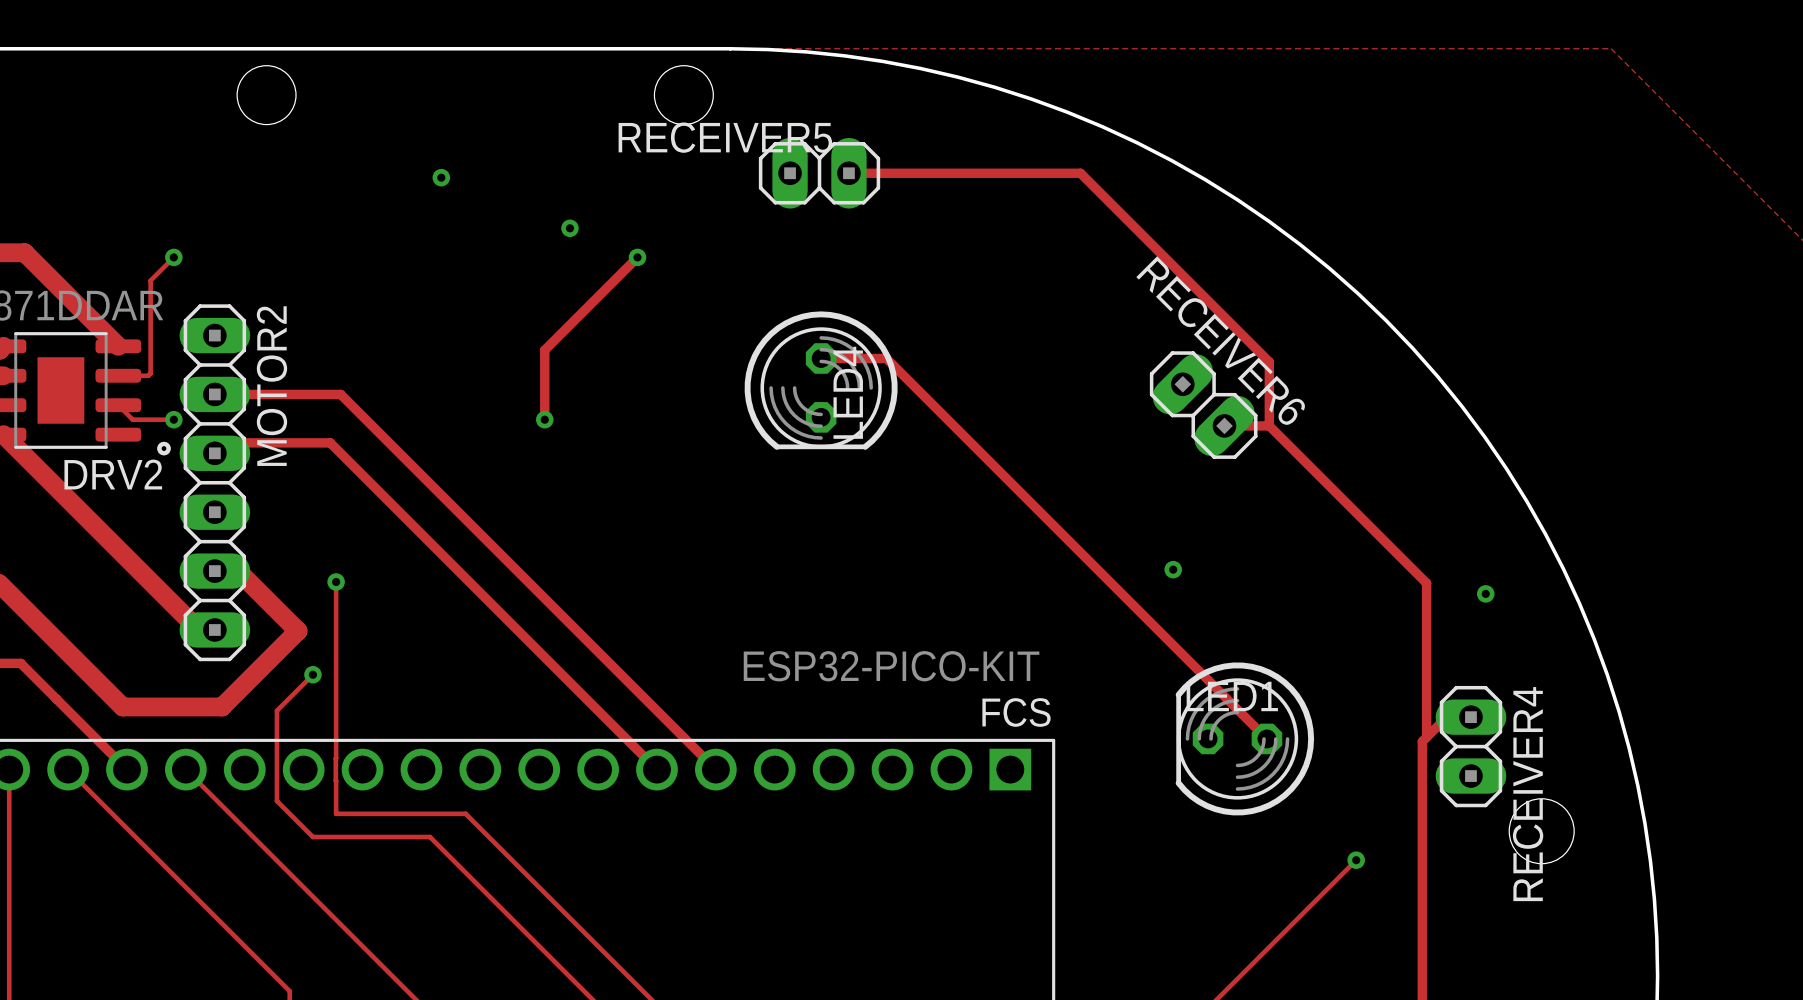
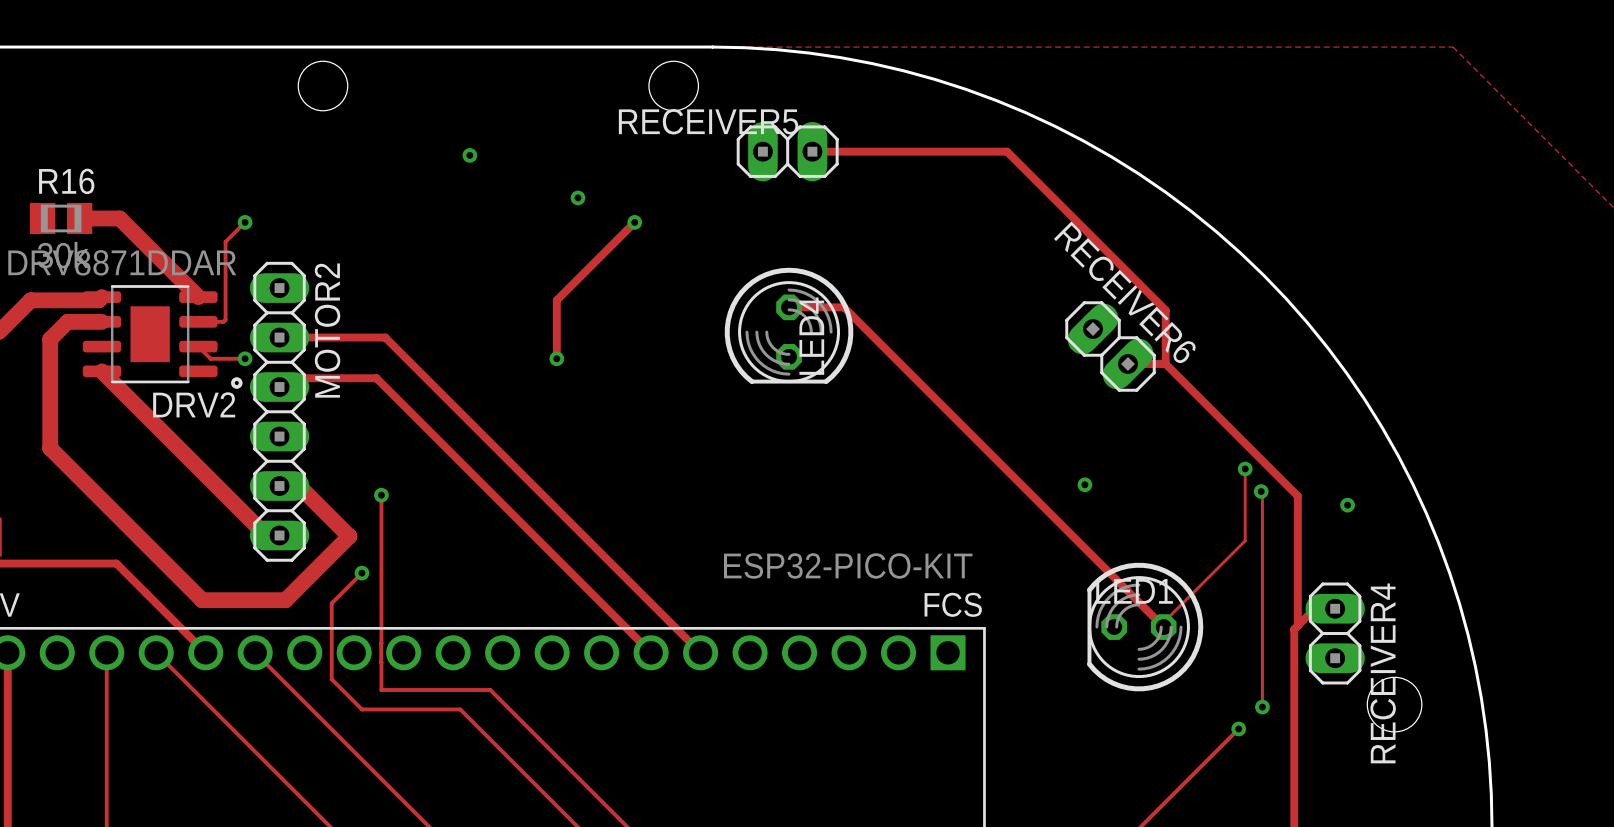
track: none -> (1245, 468) (1245, 540) (1163, 622) (1163, 627)
via: none -> (1245, 468)
track: none -> (1261, 491) (1262, 707)
via: none -> (1261, 491)
via: none -> (1262, 707)

